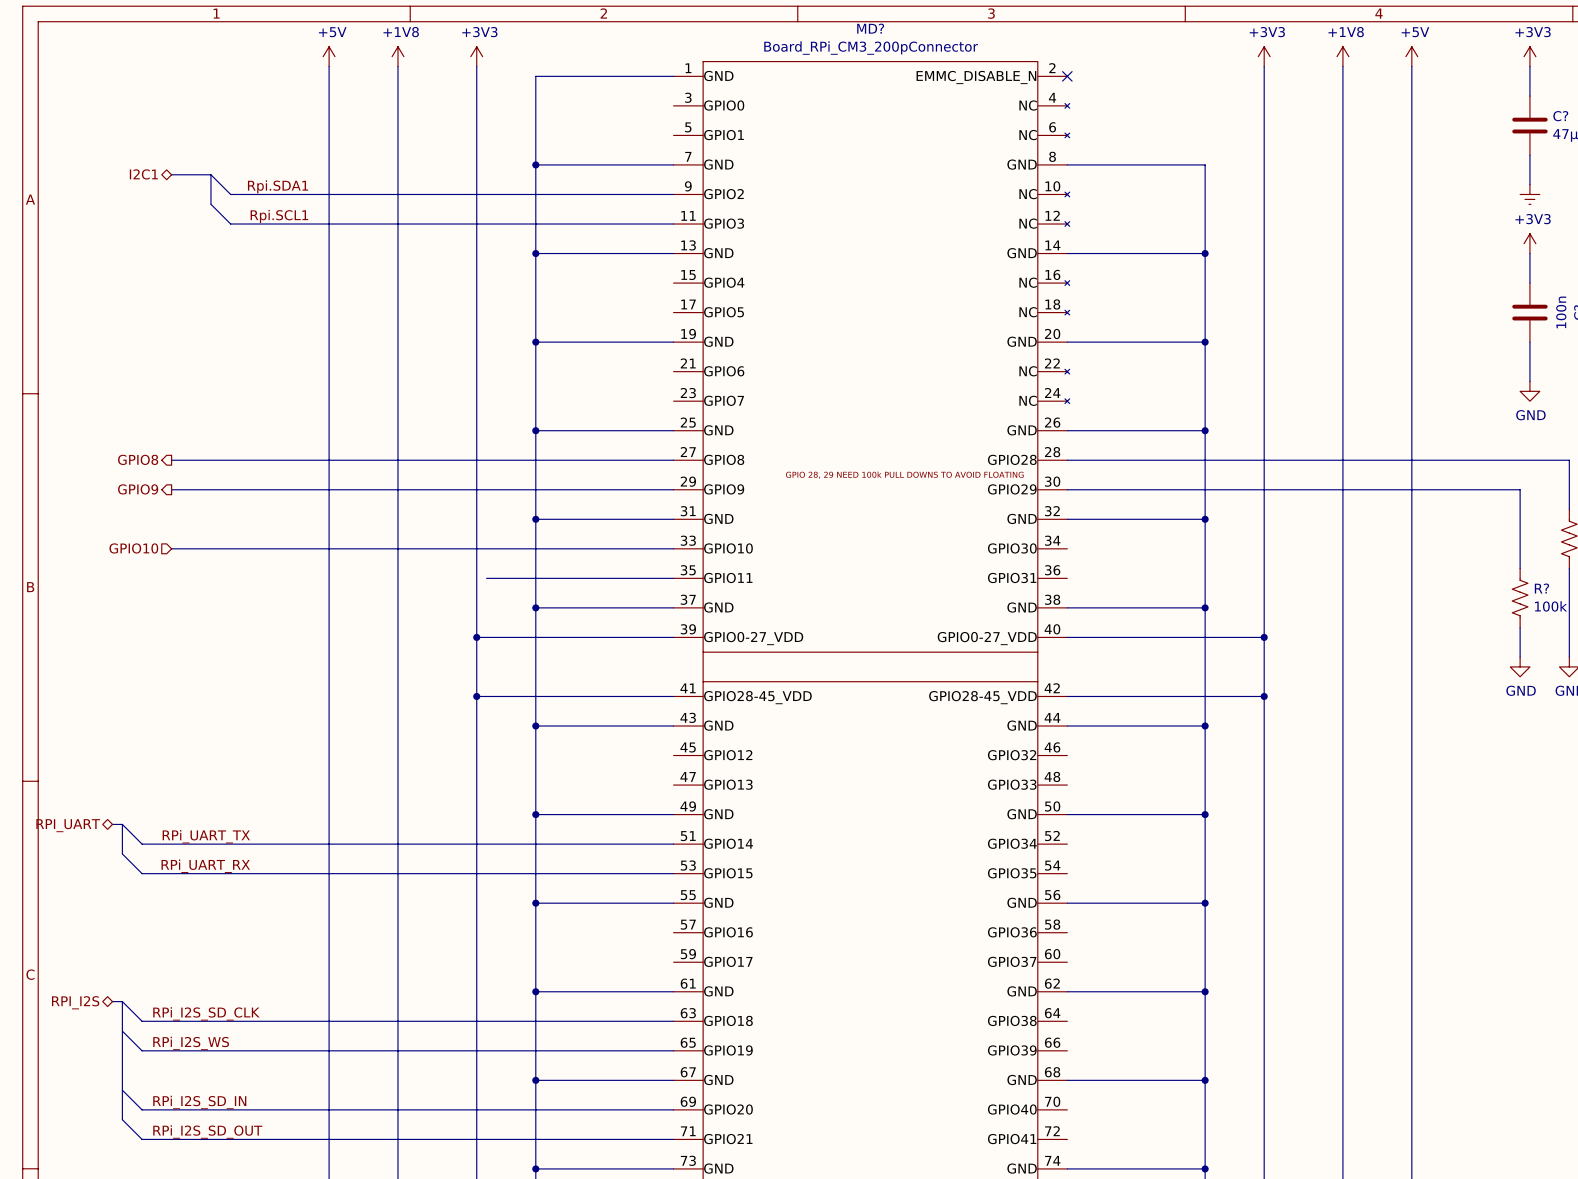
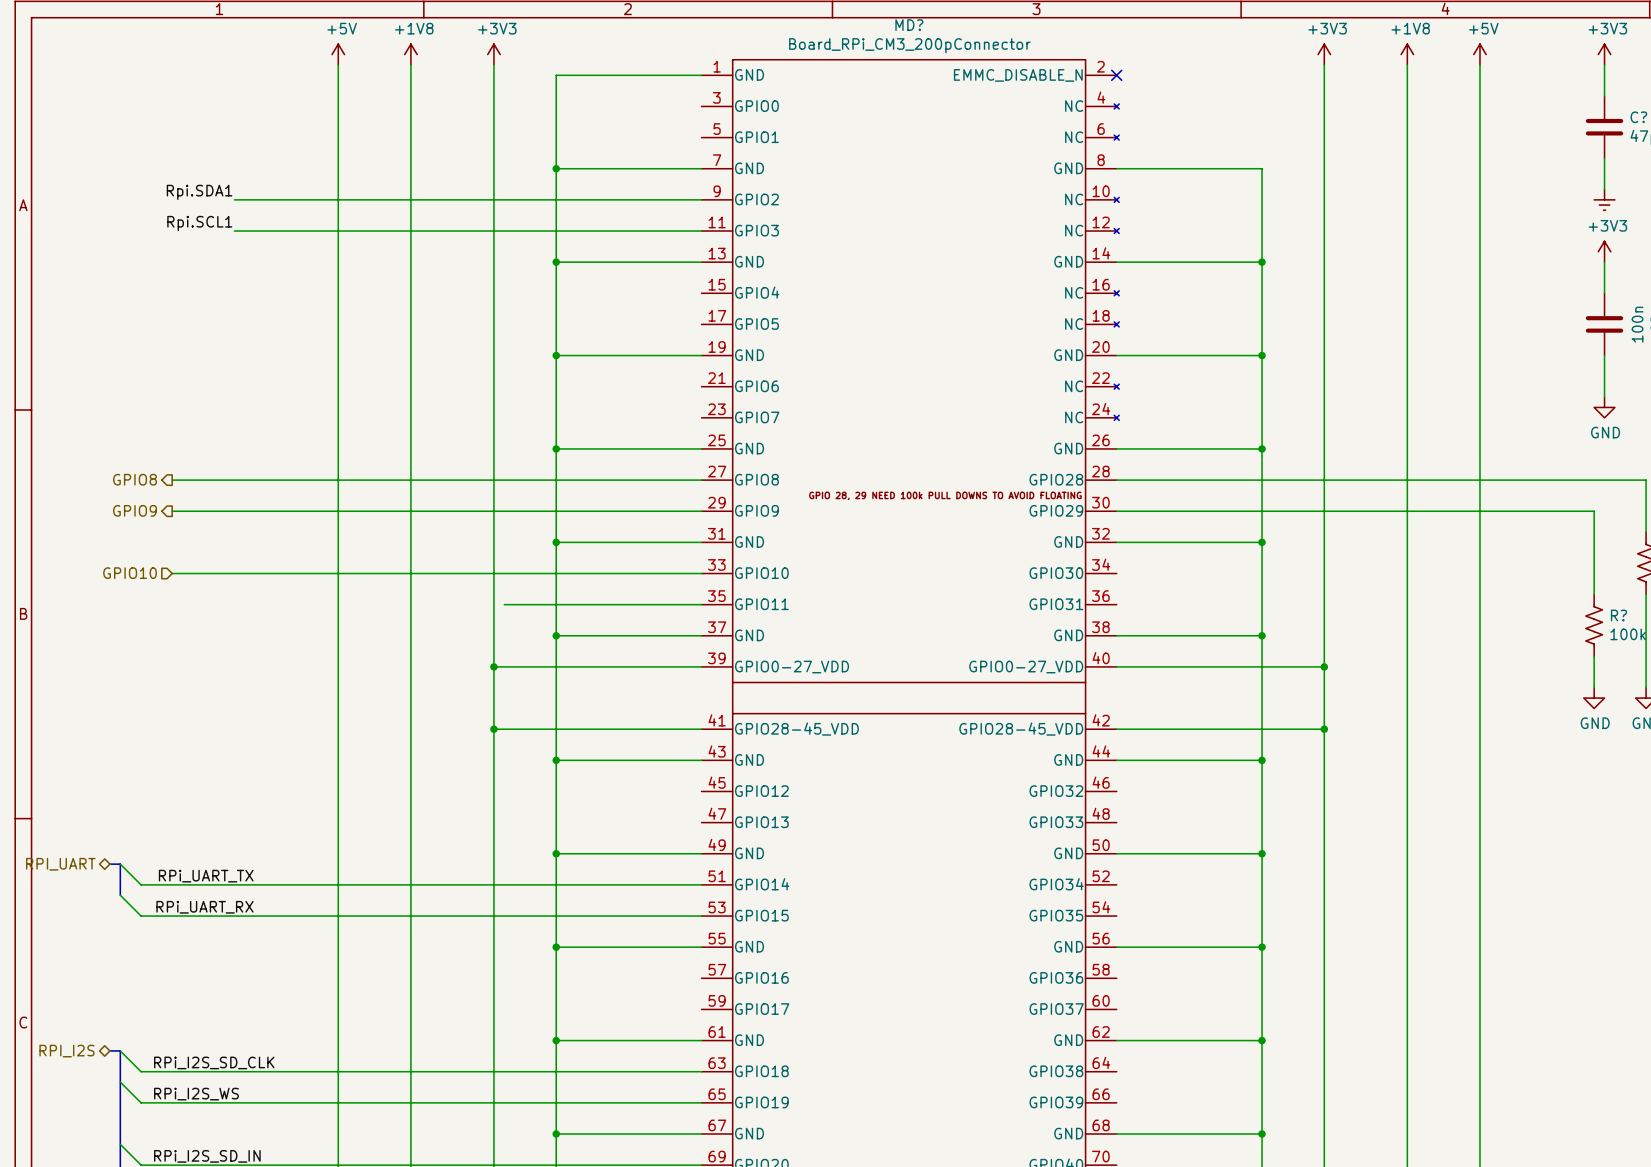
hierarchical label: I2C1 (143, 174) -> none
bus: (171, 174) (210, 174) (210, 204) -> none
wire: (210, 174) (230, 194) -> none
label position: Rpi.SDA1 (278, 186) -> Rpi.SDA1 (199, 192)
wire: (210, 204) (230, 224) -> none
label position: Rpi.SCL1 (279, 216) -> Rpi.SCL1 (199, 223)

